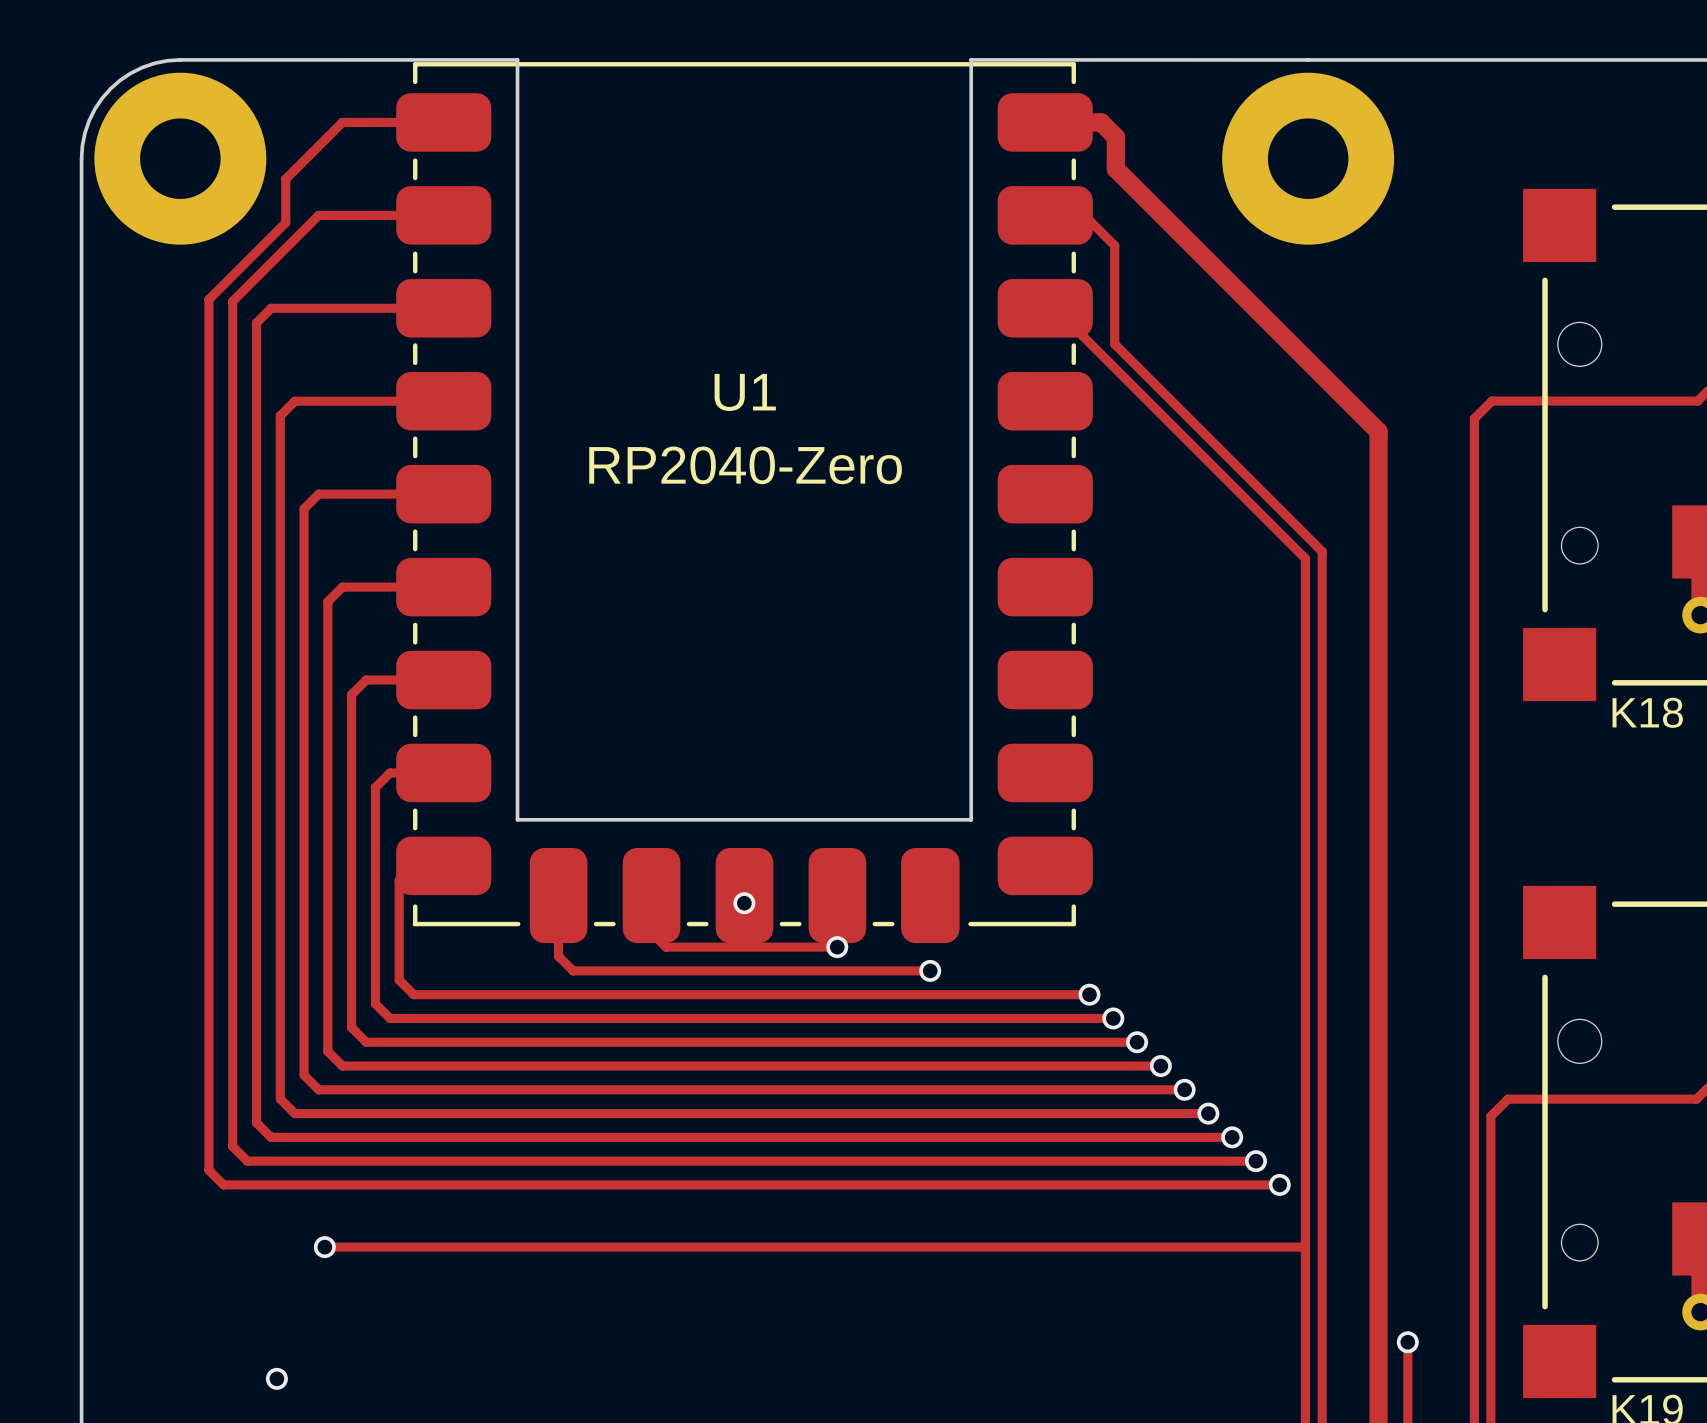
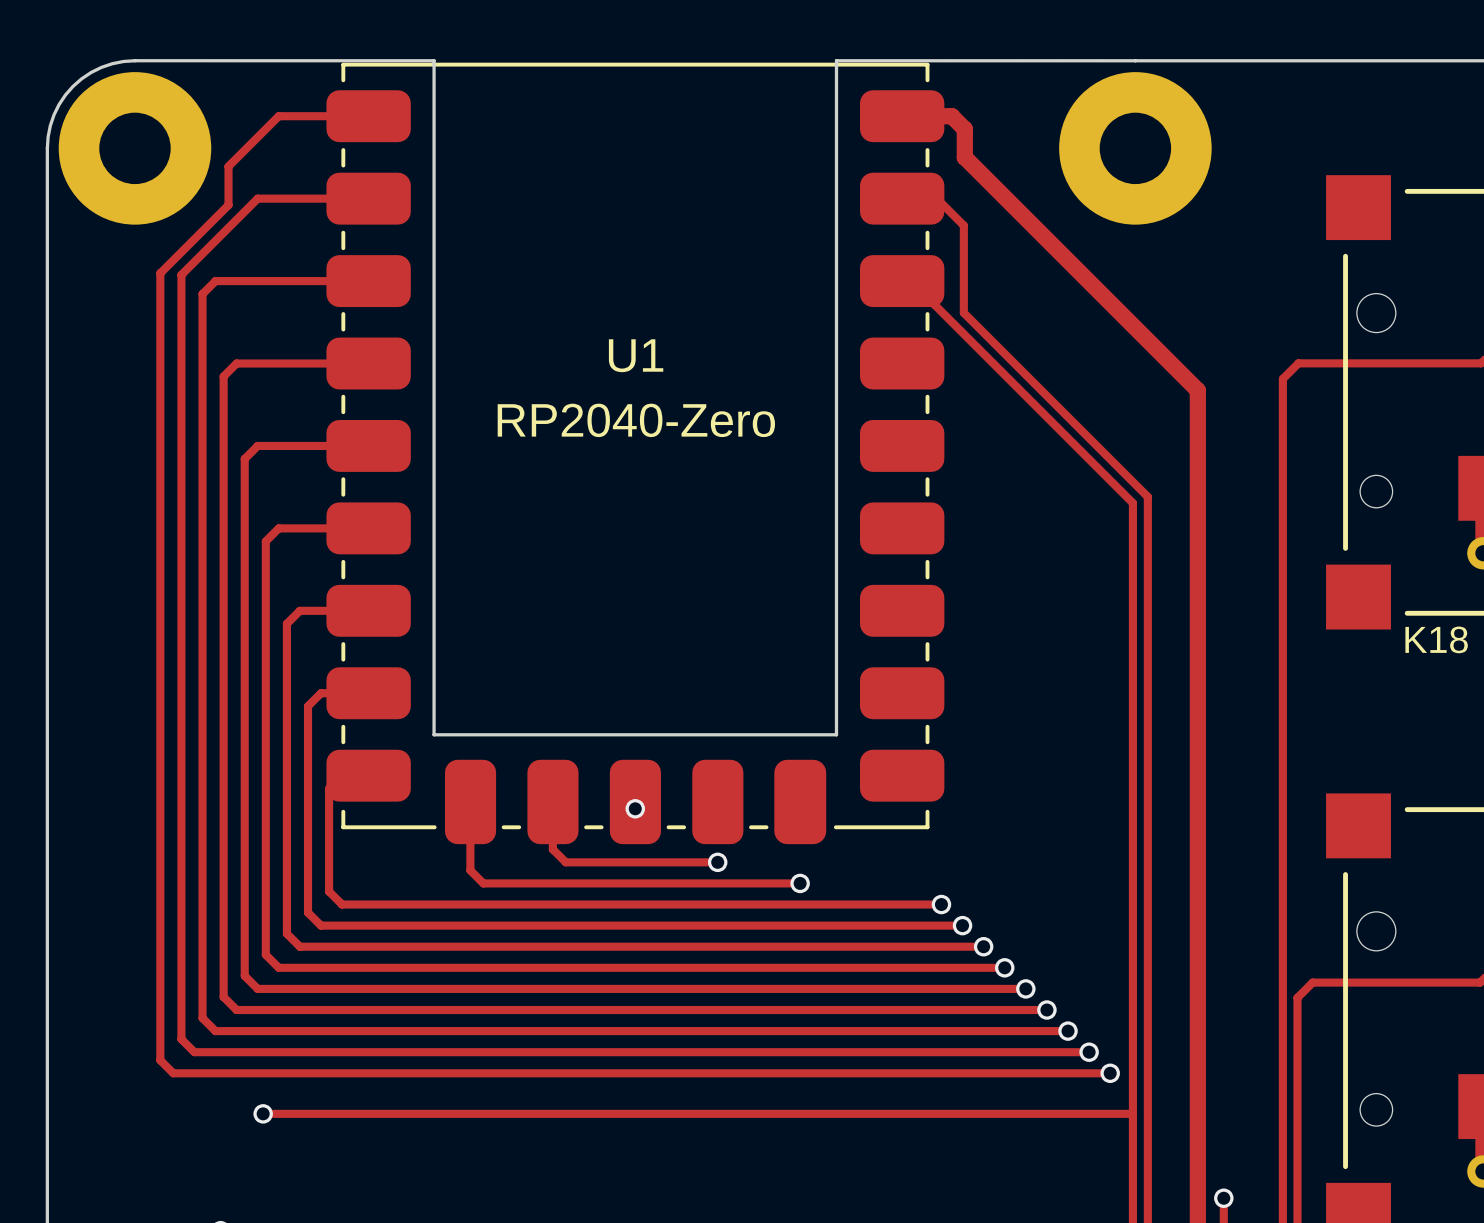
track: (651, 932) (666, 947) (837, 947) -> (552, 834) (552, 849) (565, 862) (717, 862)
via position: (837, 947) -> (717, 862)
track: (558, 956) (573, 970) (930, 970) -> (470, 855) (470, 870) (483, 883) (800, 883)
via position: (930, 970) -> (800, 883)
track: (399, 980) (413, 994) (1089, 994) -> (329, 876) (329, 891) (342, 904) (941, 904)
via position: (1089, 994) -> (941, 904)
track: (375, 1003) (390, 1018) (1113, 1018) -> (308, 898) (308, 912) (320, 925) (962, 925)
via position: (1113, 1018) -> (962, 925)
track: (351, 1027) (366, 1042) (1137, 1042) -> (286, 919) (286, 933) (299, 946) (983, 946)
via position: (1137, 1042) -> (983, 946)
track: (327, 1051) (342, 1066) (1160, 1066) -> (265, 940) (265, 954) (278, 967) (1004, 967)
via position: (1160, 1066) -> (1004, 967)
track: (304, 1075) (318, 1089) (1184, 1089) -> (244, 961) (244, 975) (257, 988) (1025, 988)
via position: (1184, 1089) -> (1025, 988)
track: (280, 1098) (294, 1113) (1208, 1113) -> (223, 982) (223, 997) (236, 1010) (1046, 1010)
via position: (1208, 1113) -> (1046, 1010)
track: (256, 1122) (271, 1137) (1232, 1137) -> (202, 1003) (202, 1018) (215, 1031) (1068, 1031)
via position: (1232, 1137) -> (1068, 1031)
track: (232, 1146) (247, 1161) (1255, 1161) -> (181, 1024) (181, 1039) (194, 1052) (1089, 1052)
via position: (1255, 1161) -> (1089, 1052)
track: (208, 1170) (223, 1184) (1279, 1184) -> (160, 1045) (160, 1060) (173, 1073) (1110, 1073)
via position: (1279, 1184) -> (1110, 1073)

